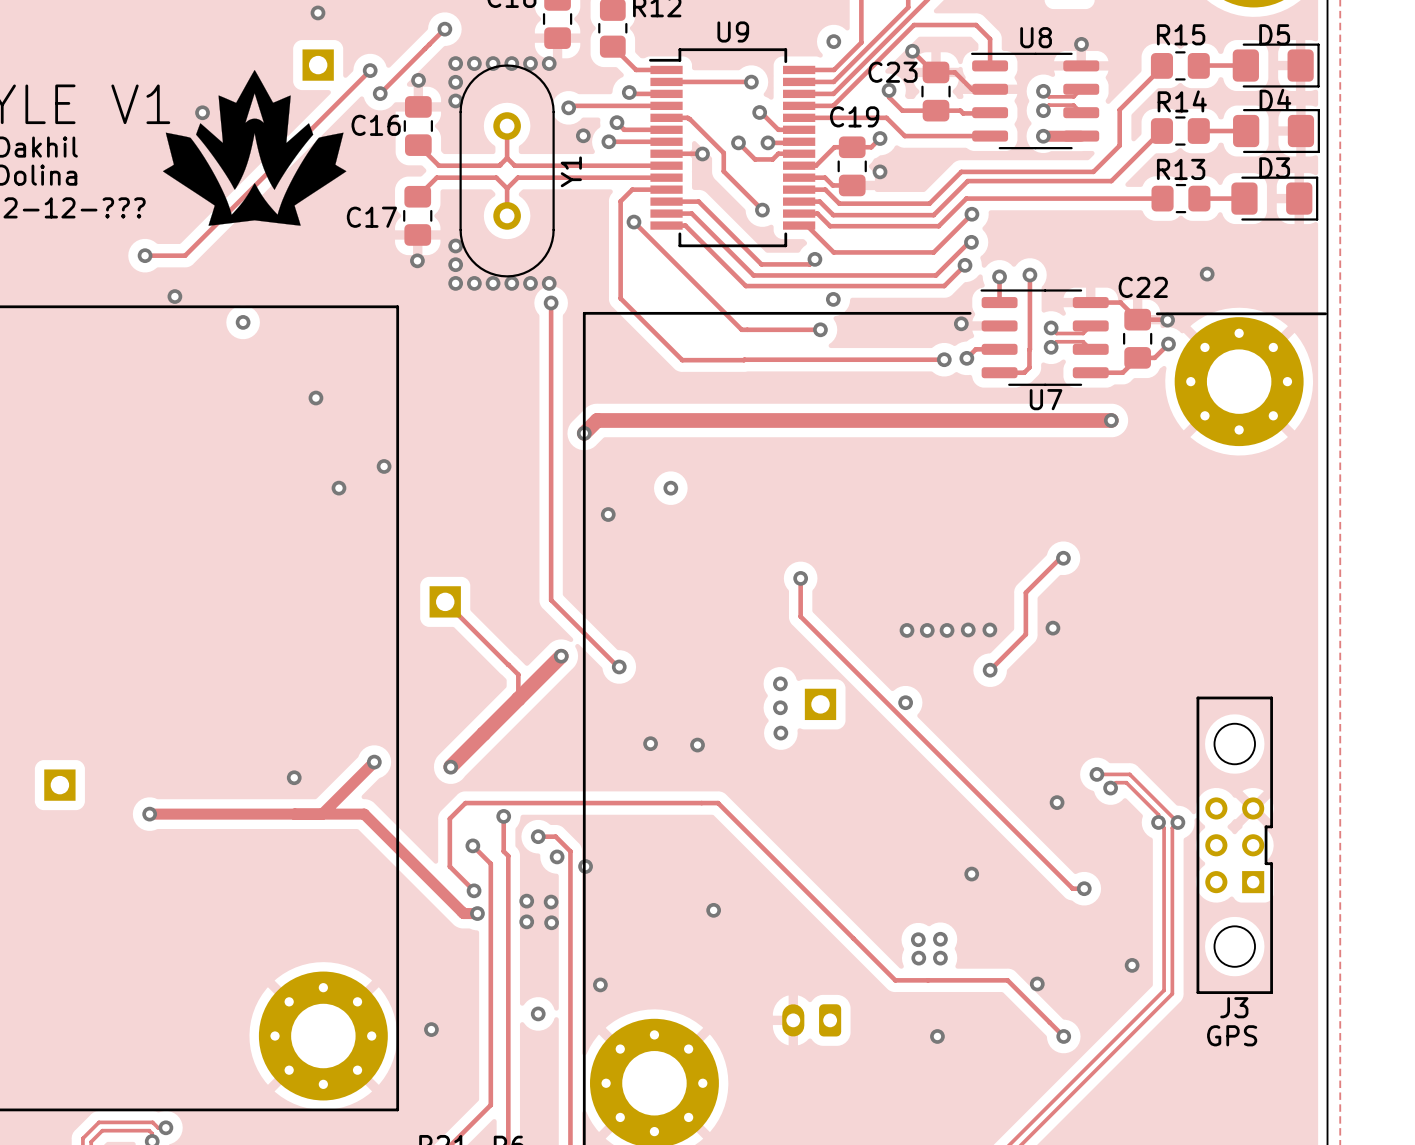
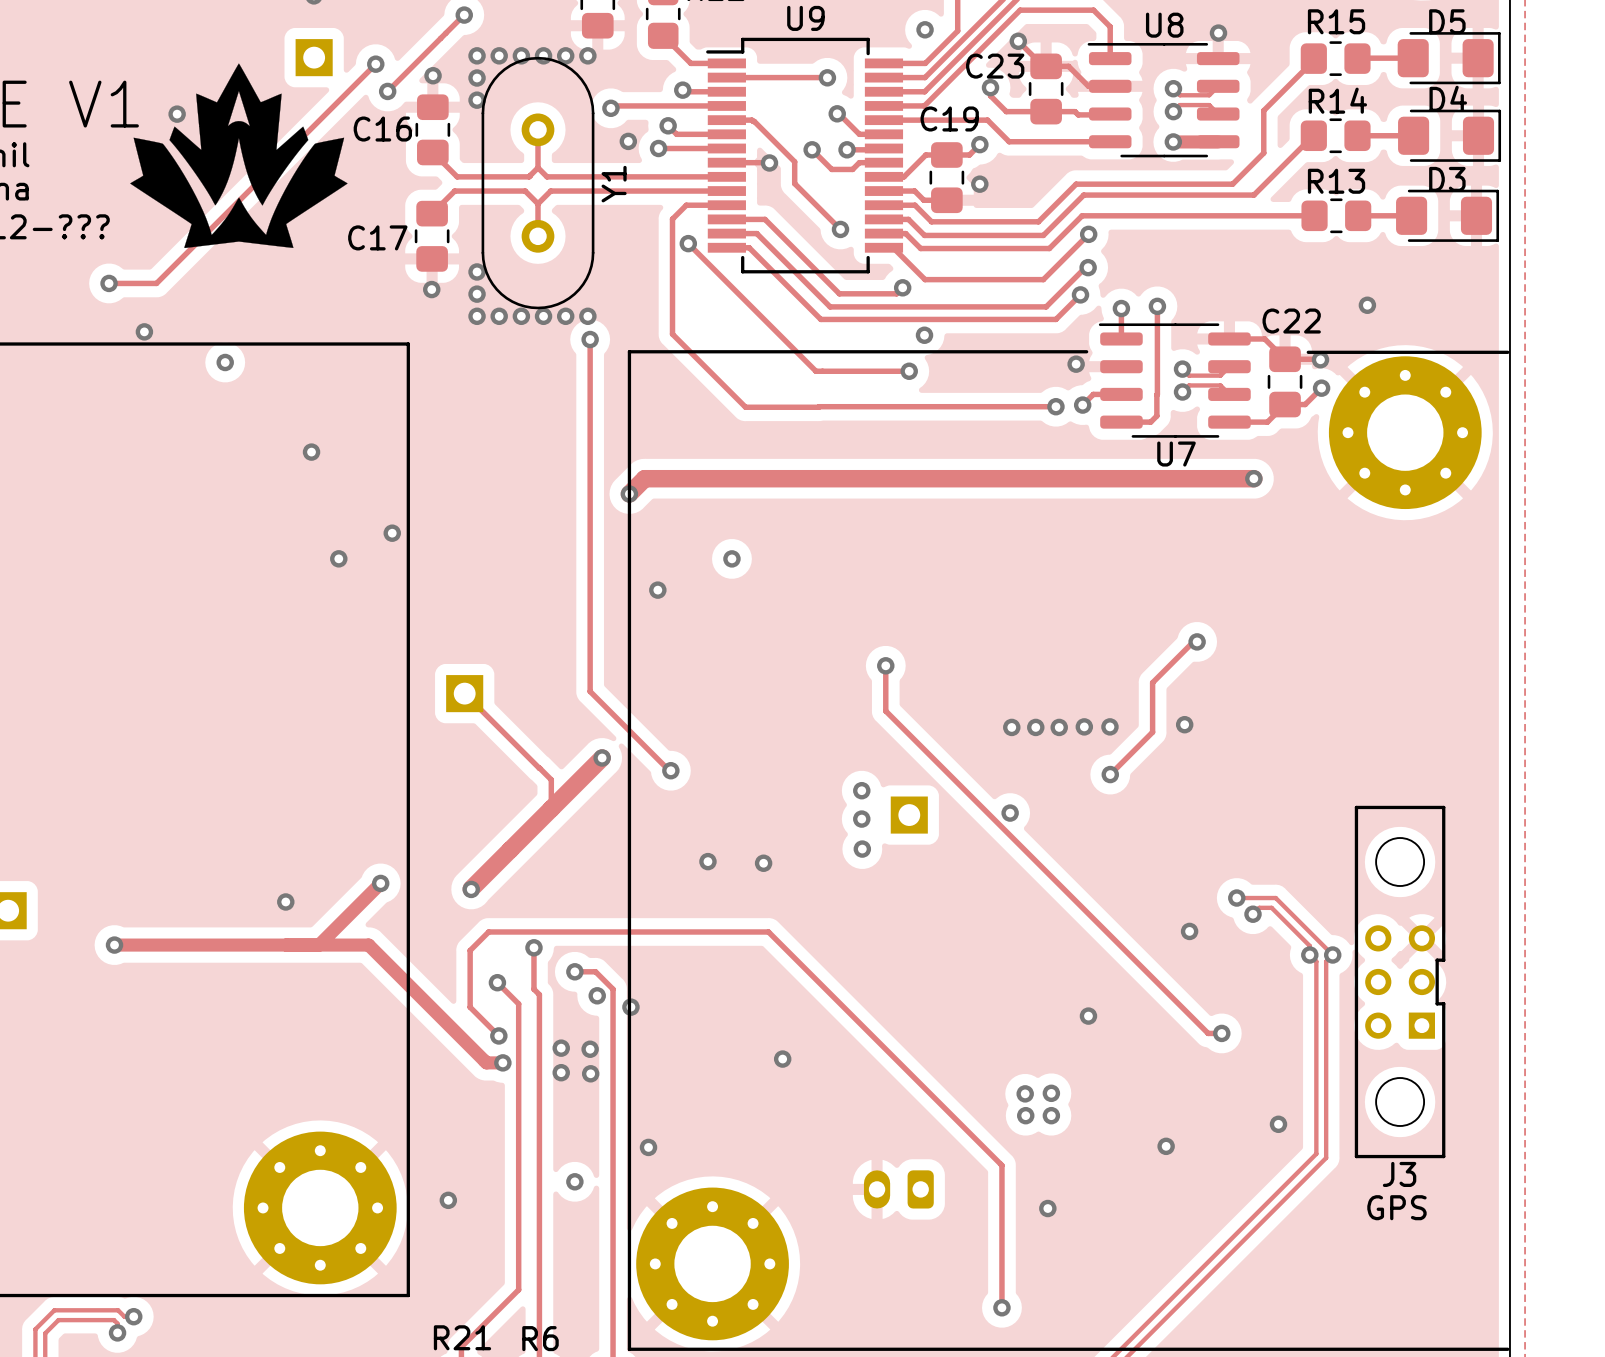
track: (701, 803) (718, 803) (895, 980) (1007, 980) (1063, 1036) -> (768, 931) (1001, 1165) (1001, 1307)
via: (1063, 1036) -> none
via: none -> (1001, 1307)

